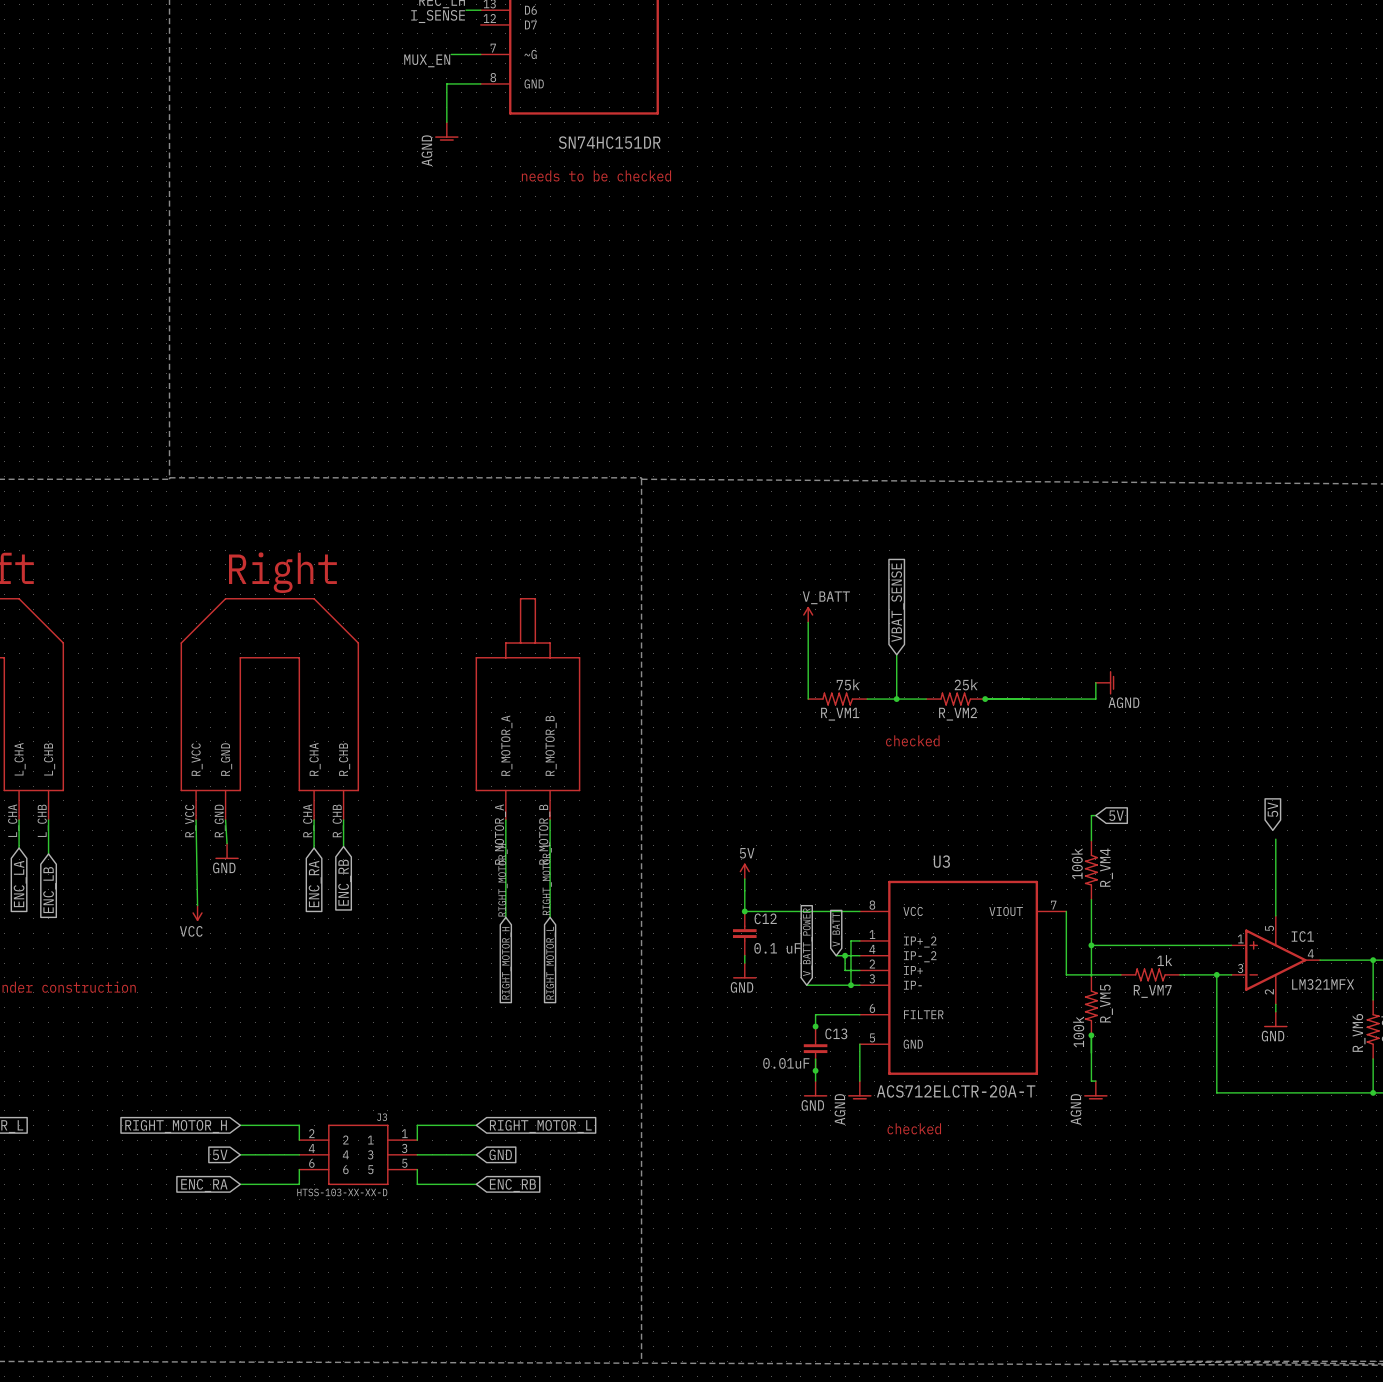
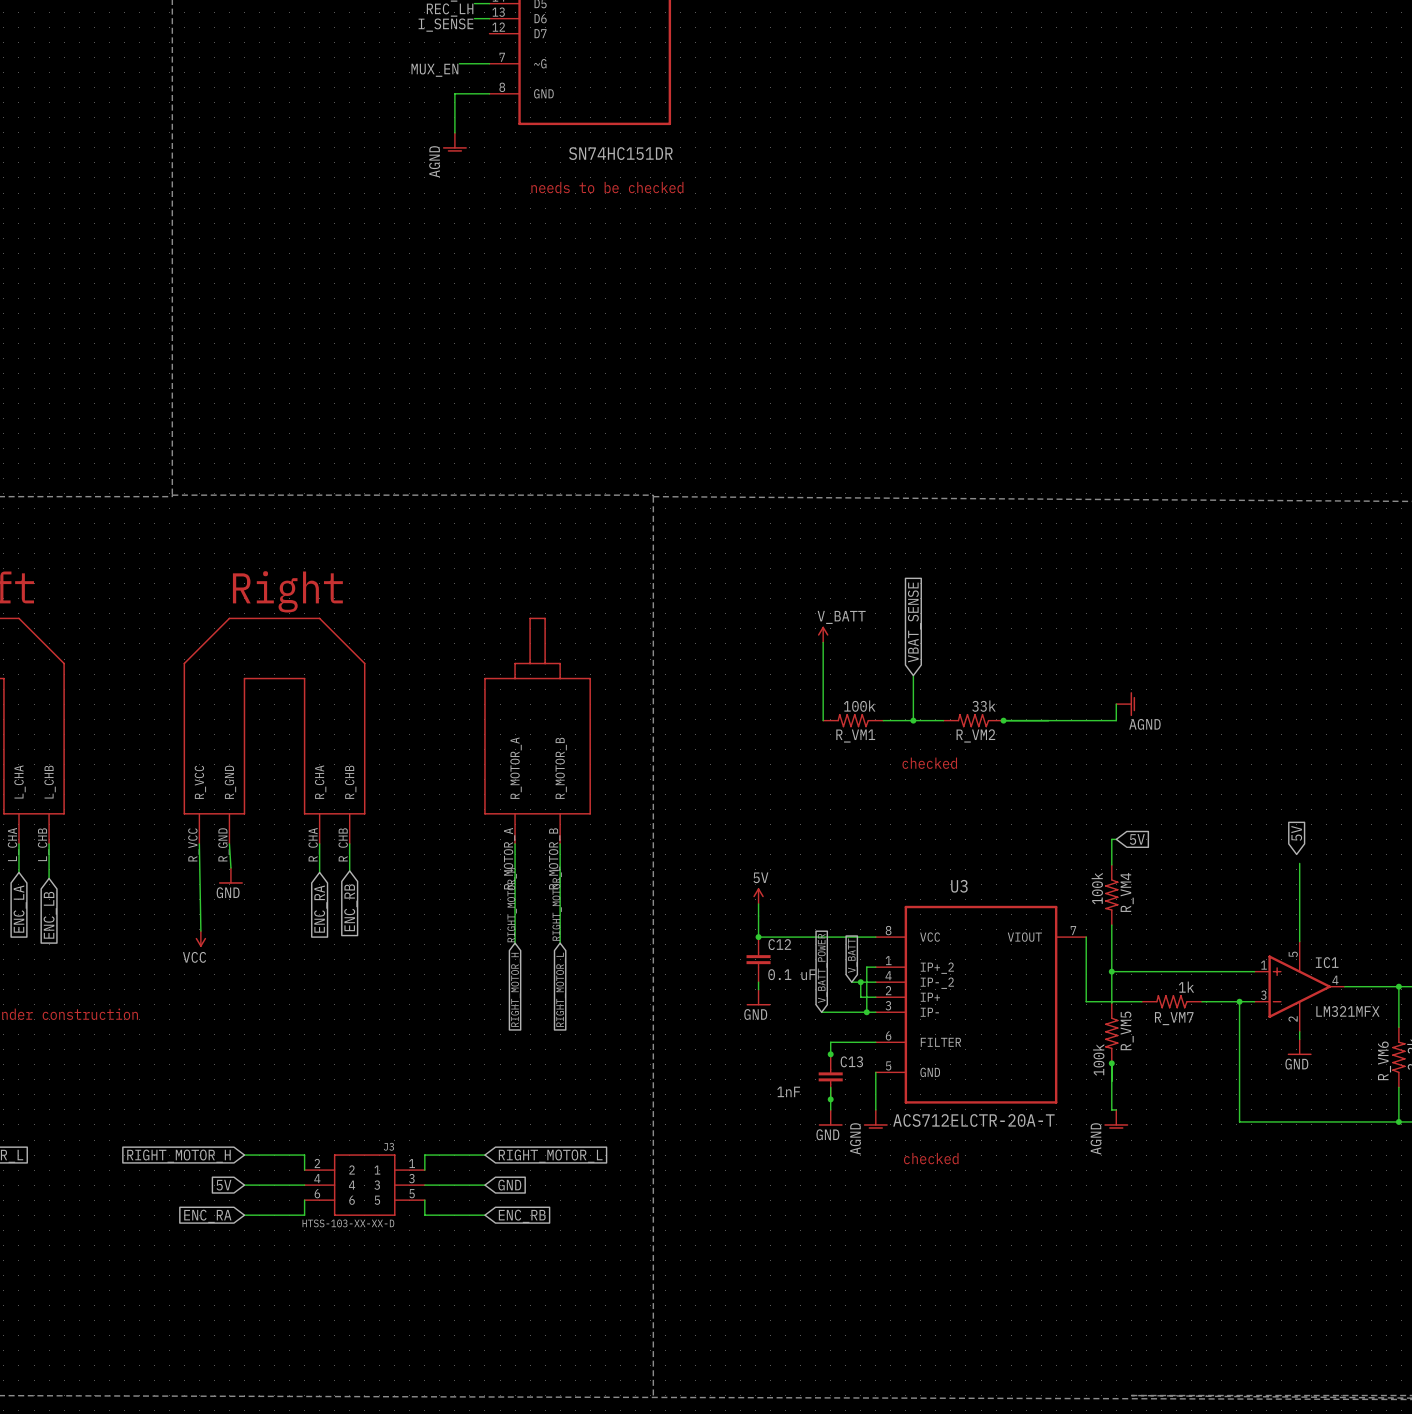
R_VM1 value: 75k (848, 684) -> 100k (859, 706)
R_VM2 value: 25k (966, 684) -> 33k (983, 706)
C13 value: 0.01uF (786, 1063) -> 1nF (788, 1091)

